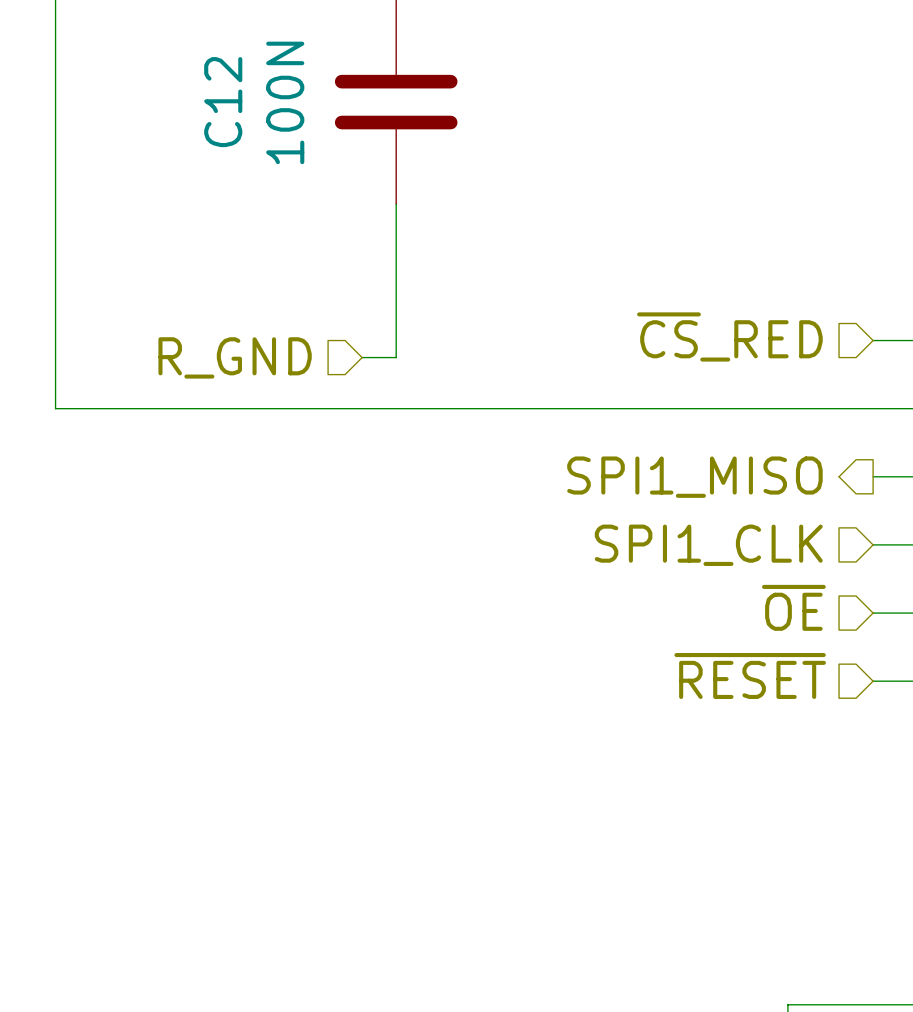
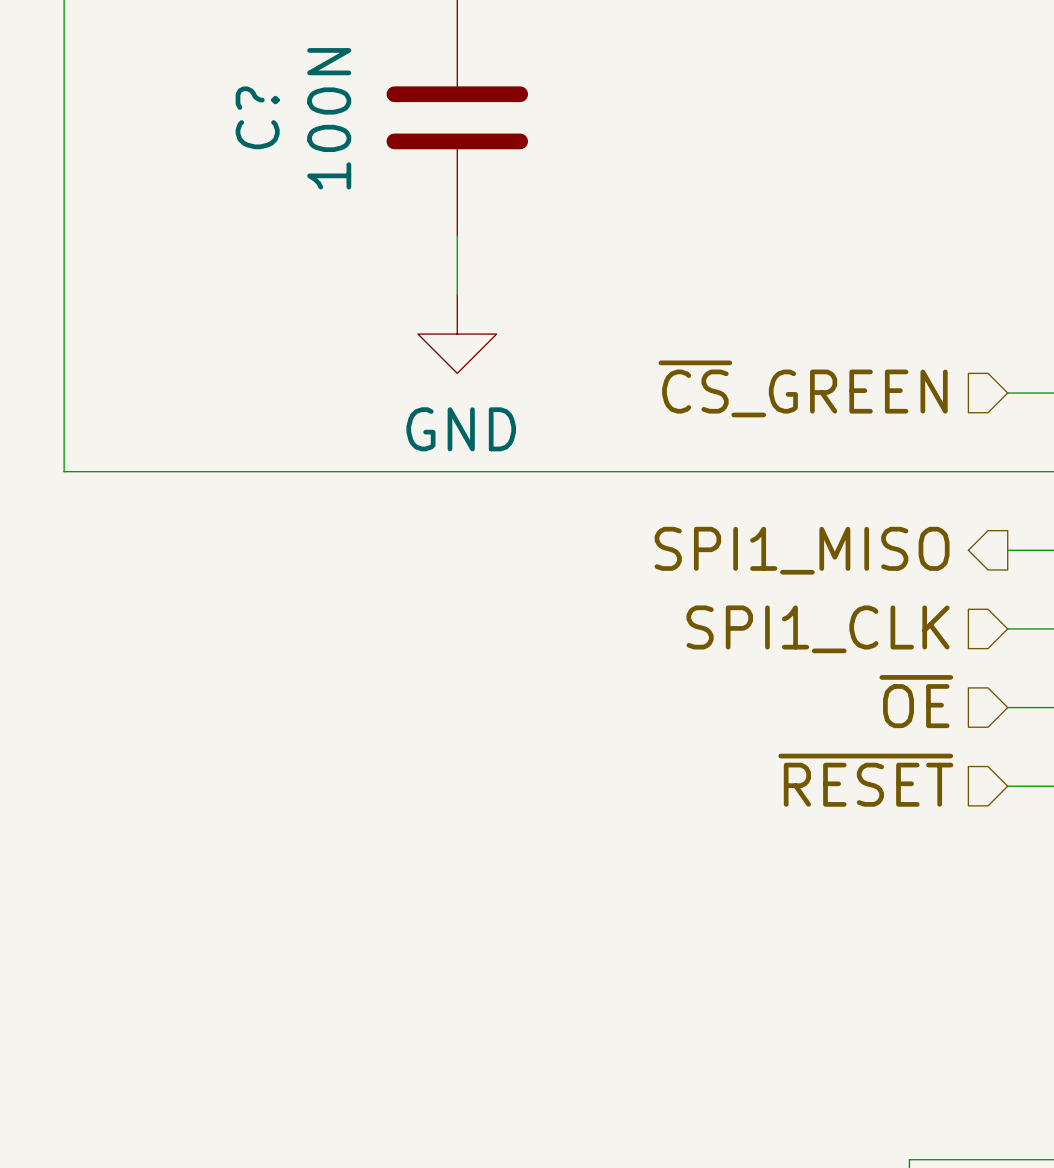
C12 name: C12 (223, 102) -> C? (257, 117)
wire: (396, 255) (396, 357) (362, 357) -> none
power symbol: none -> GND (457, 334)
hierarchical label: ~{CS}_RED (729, 336) -> ~{CS}_GREEN (803, 388)
hierarchical label: R_GND (235, 357) -> none

